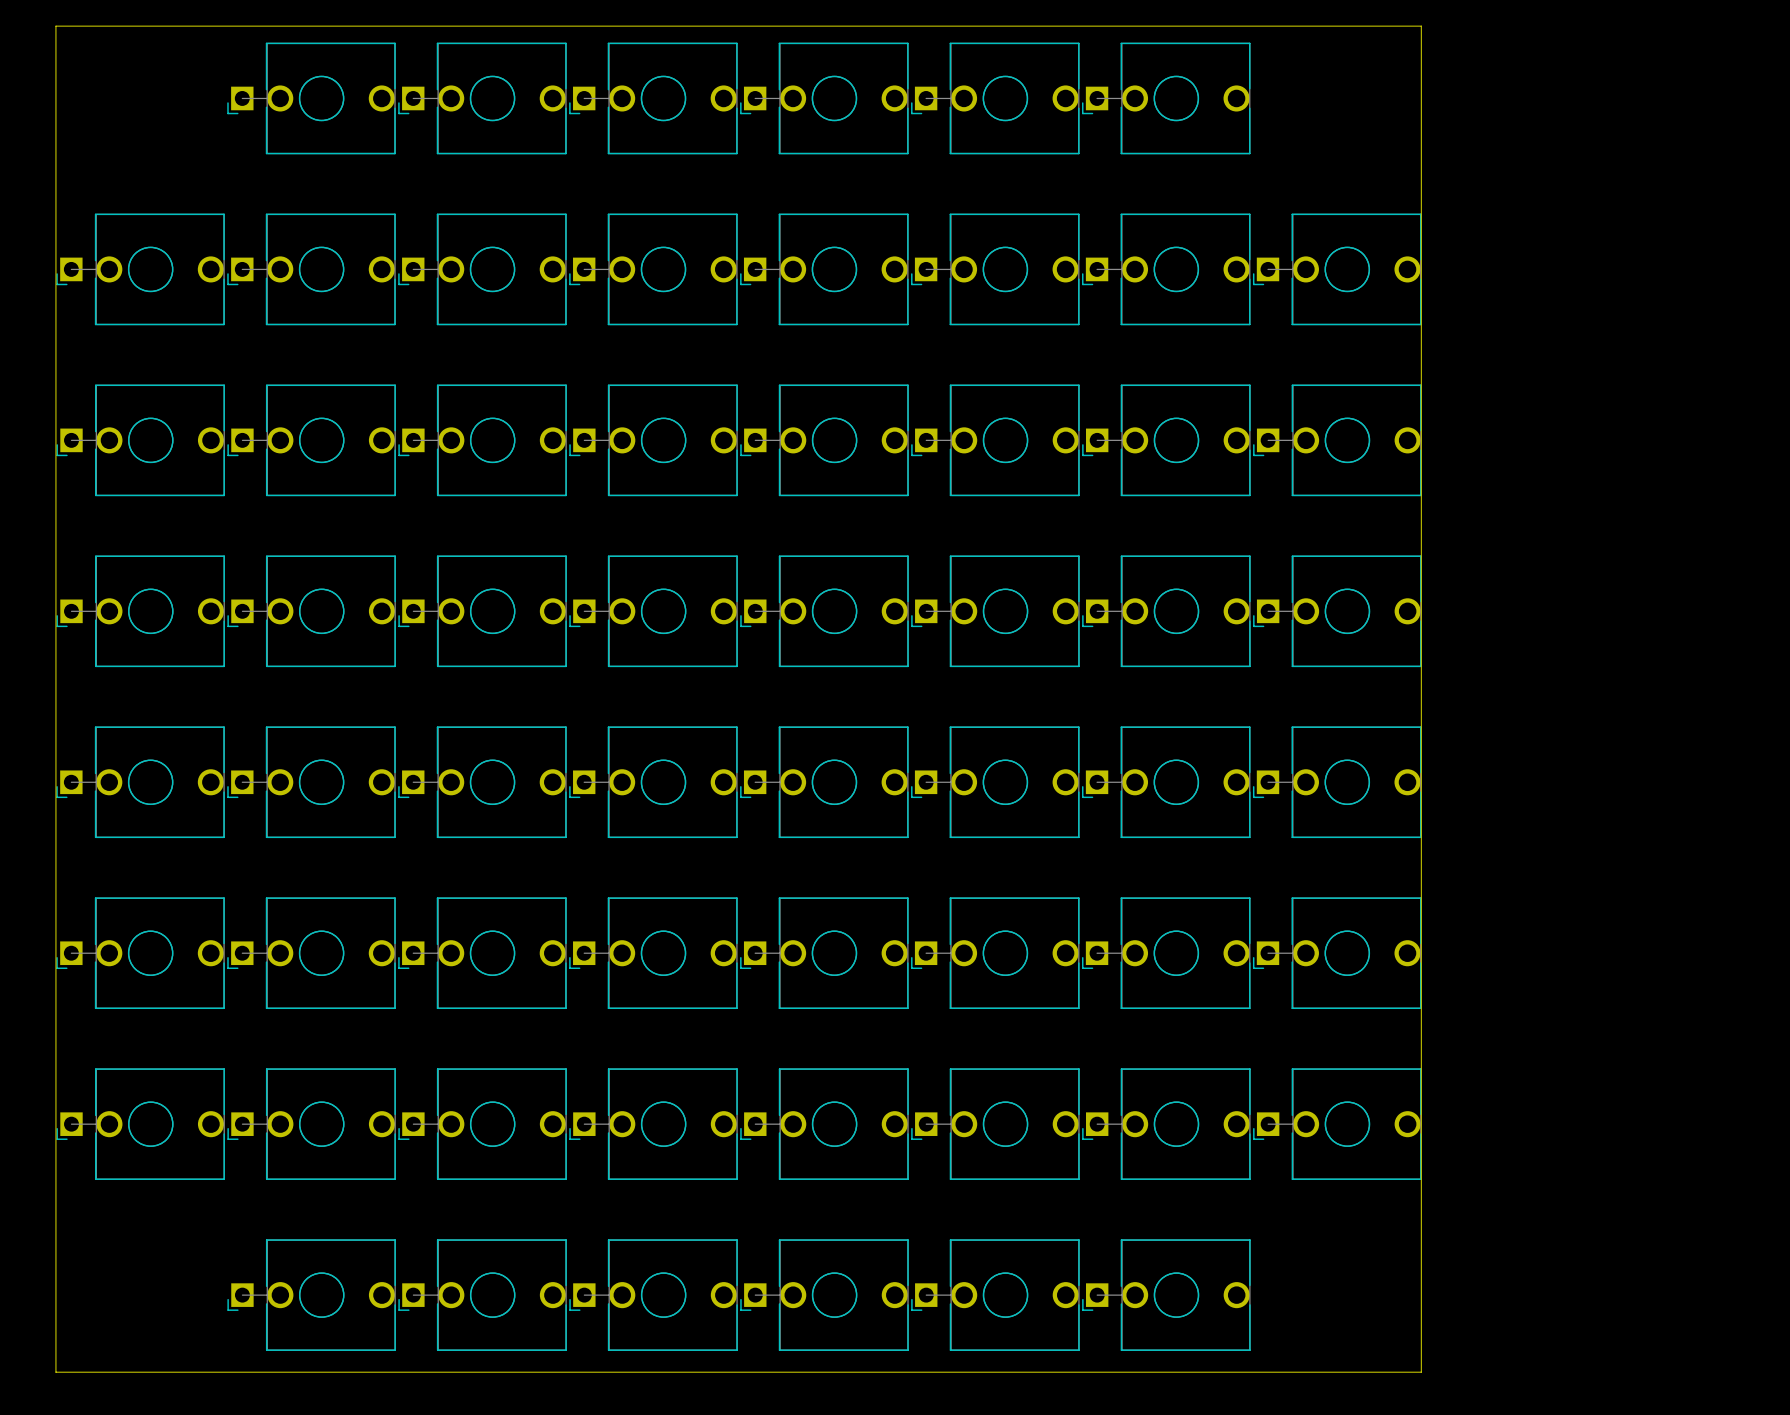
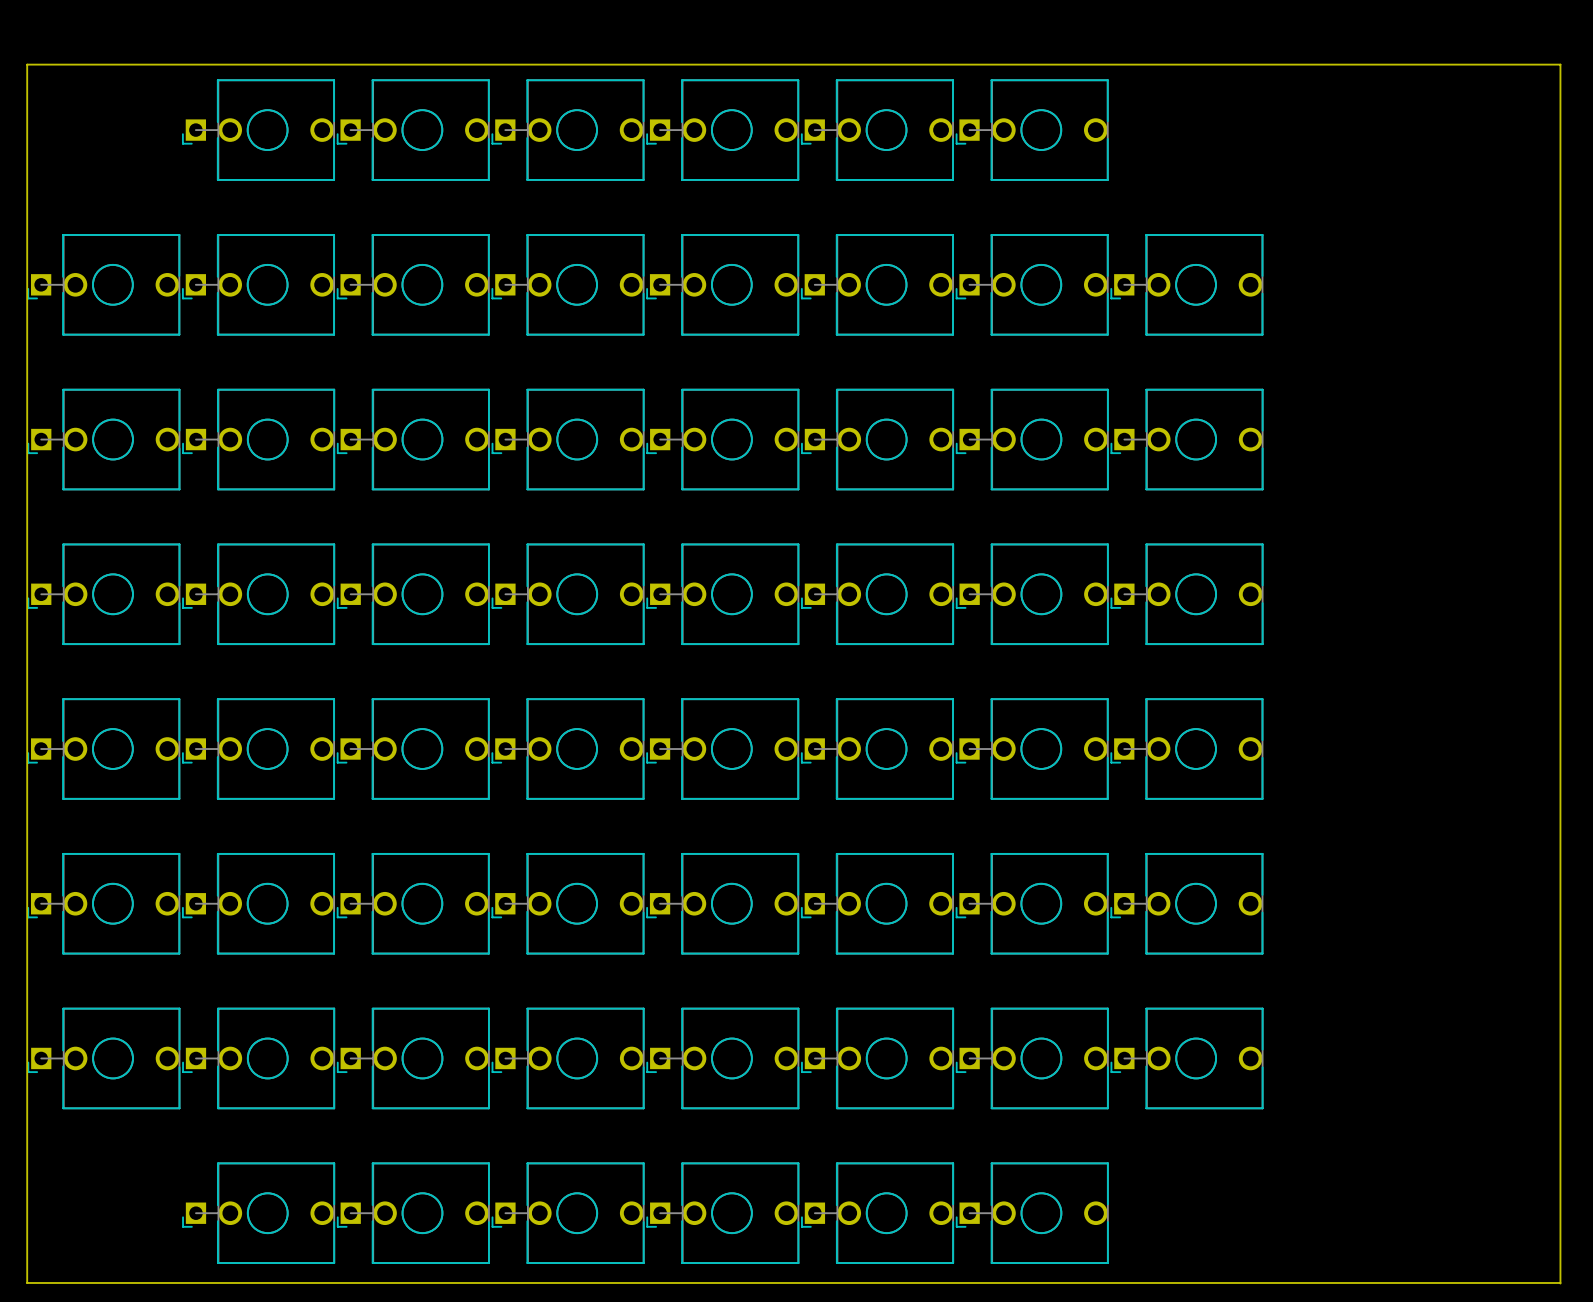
board edge: (1421, 26) (1421, 1372) -> (1263, 64) (1560, 64) (1560, 1283)
board edge: none -> (1263, 1282) (1560, 1282)

